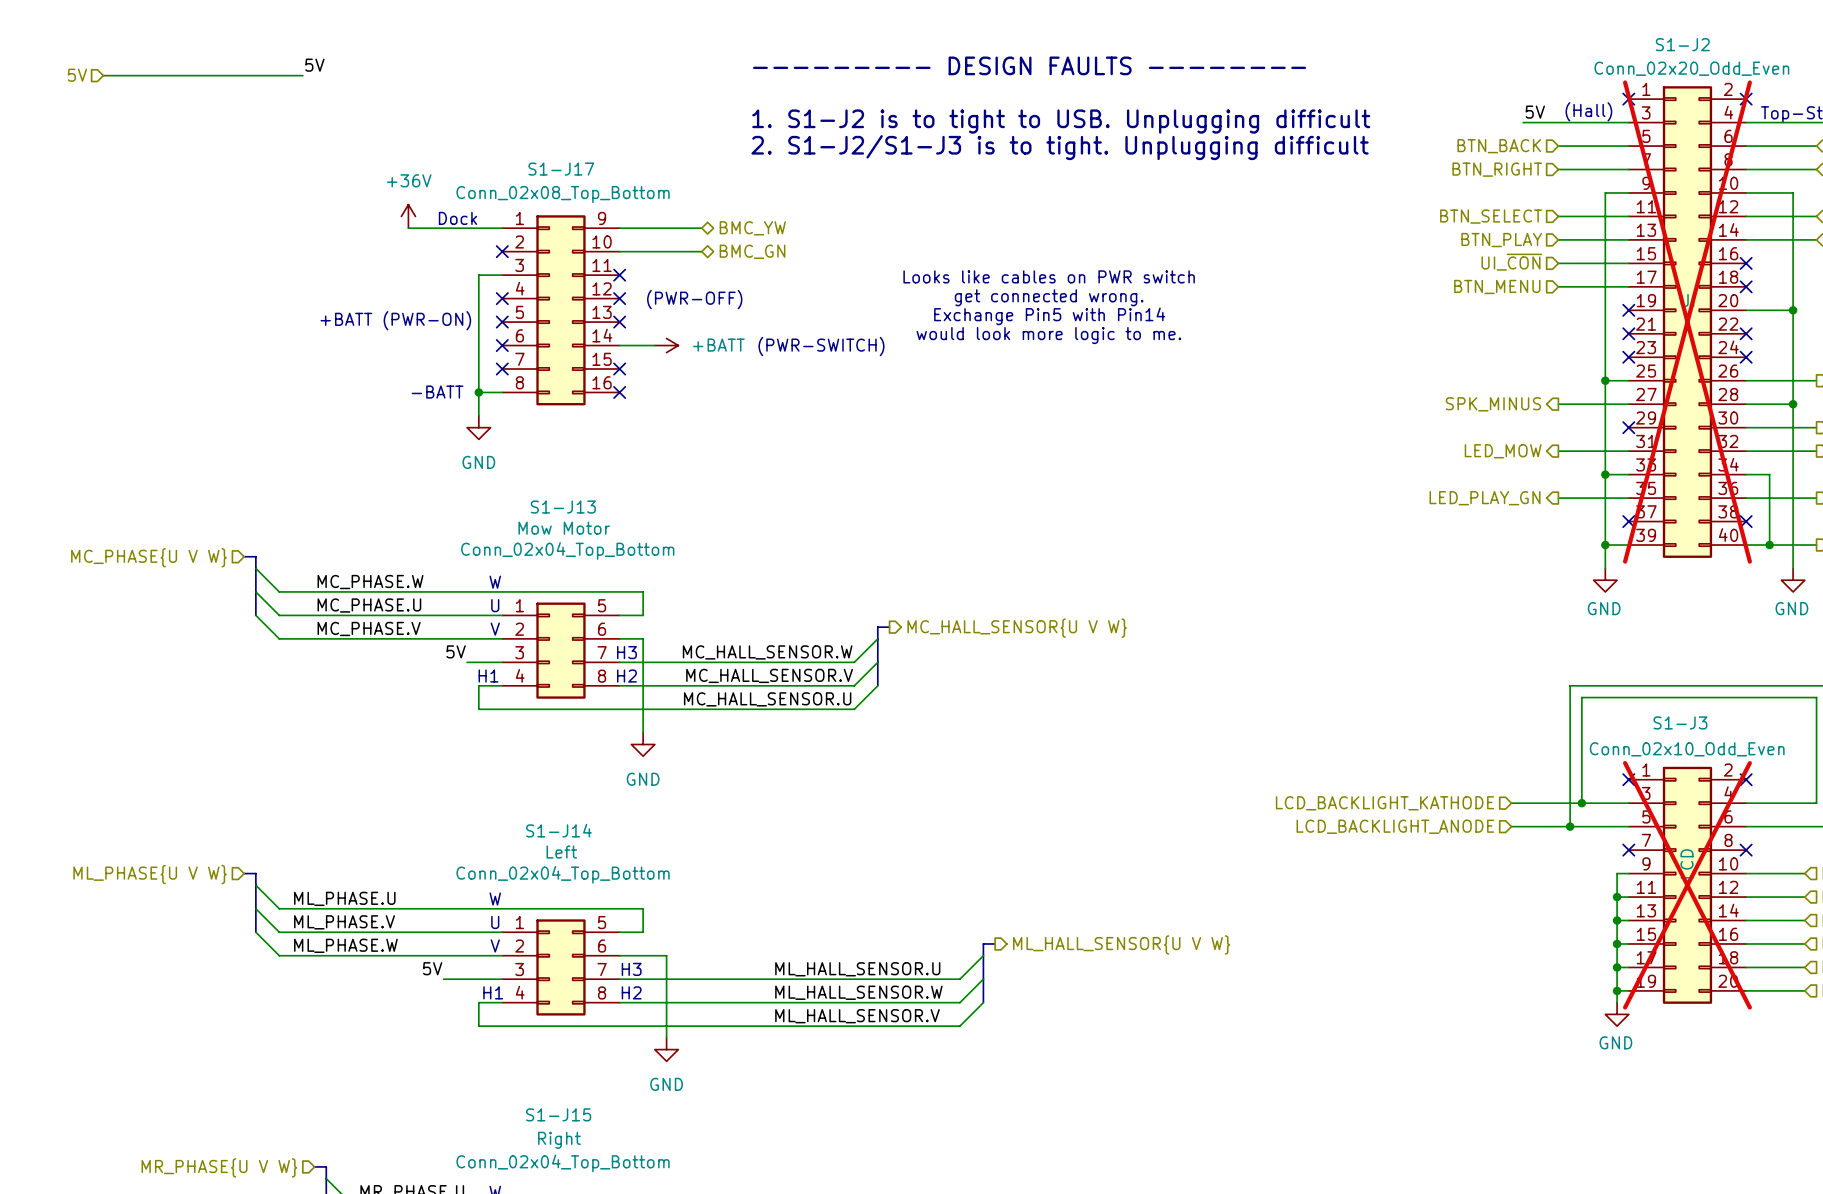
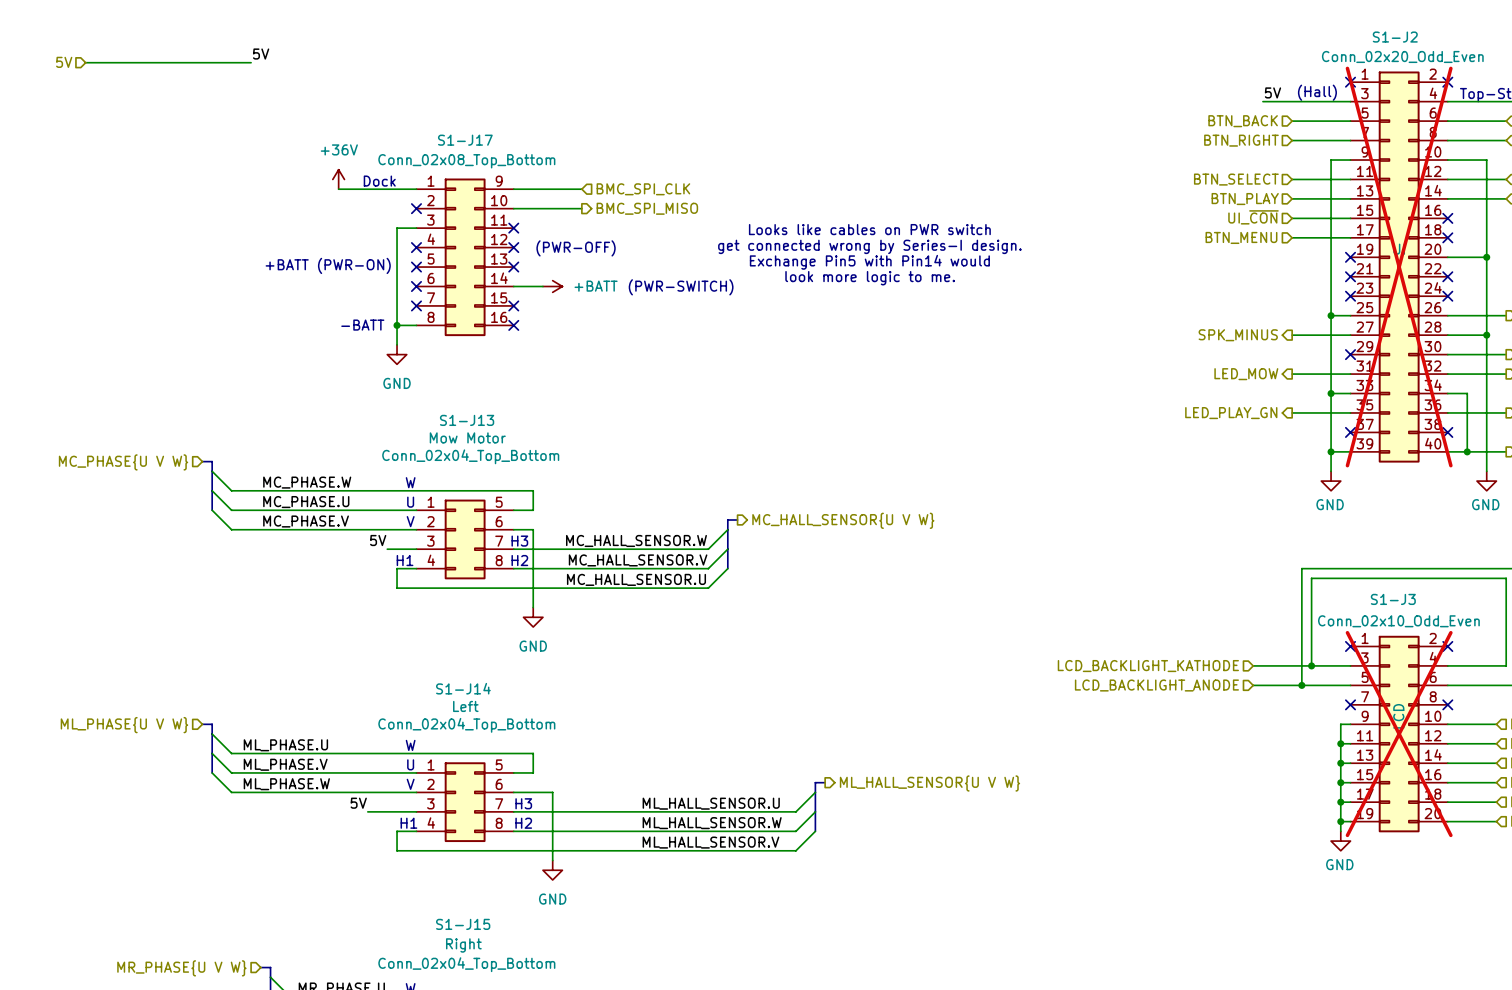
text: --------- DESIGN FAULTS -------- (1029, 65) -> none
text: 1. S1-J2 is to tight to USB. Unplugging difficult (1061, 121) -> none
text: 2. S1-J2/S1-J3 is to tight. Unplugging difficult (1060, 147) -> none
hierarchical label shape: bidirectional (752, 228) -> input (643, 189)
hierarchical label: BMC_YW (752, 228) -> BMC_SPI_CLK (643, 189)
hierarchical label shape: bidirectional (752, 251) -> output (647, 208)
hierarchical label: BMC_GN (752, 251) -> BMC_SPI_MISO (647, 208)
text: get connected wrong. (1049, 297) -> get connected wrong by Series-I design. (869, 246)
text: Exchange Pin5 with Pin14 (1049, 316) -> Exchange Pin5 with Pin14 would (869, 262)
text: would look more logic to me. (1048, 335) -> look more logic to me. (870, 278)

